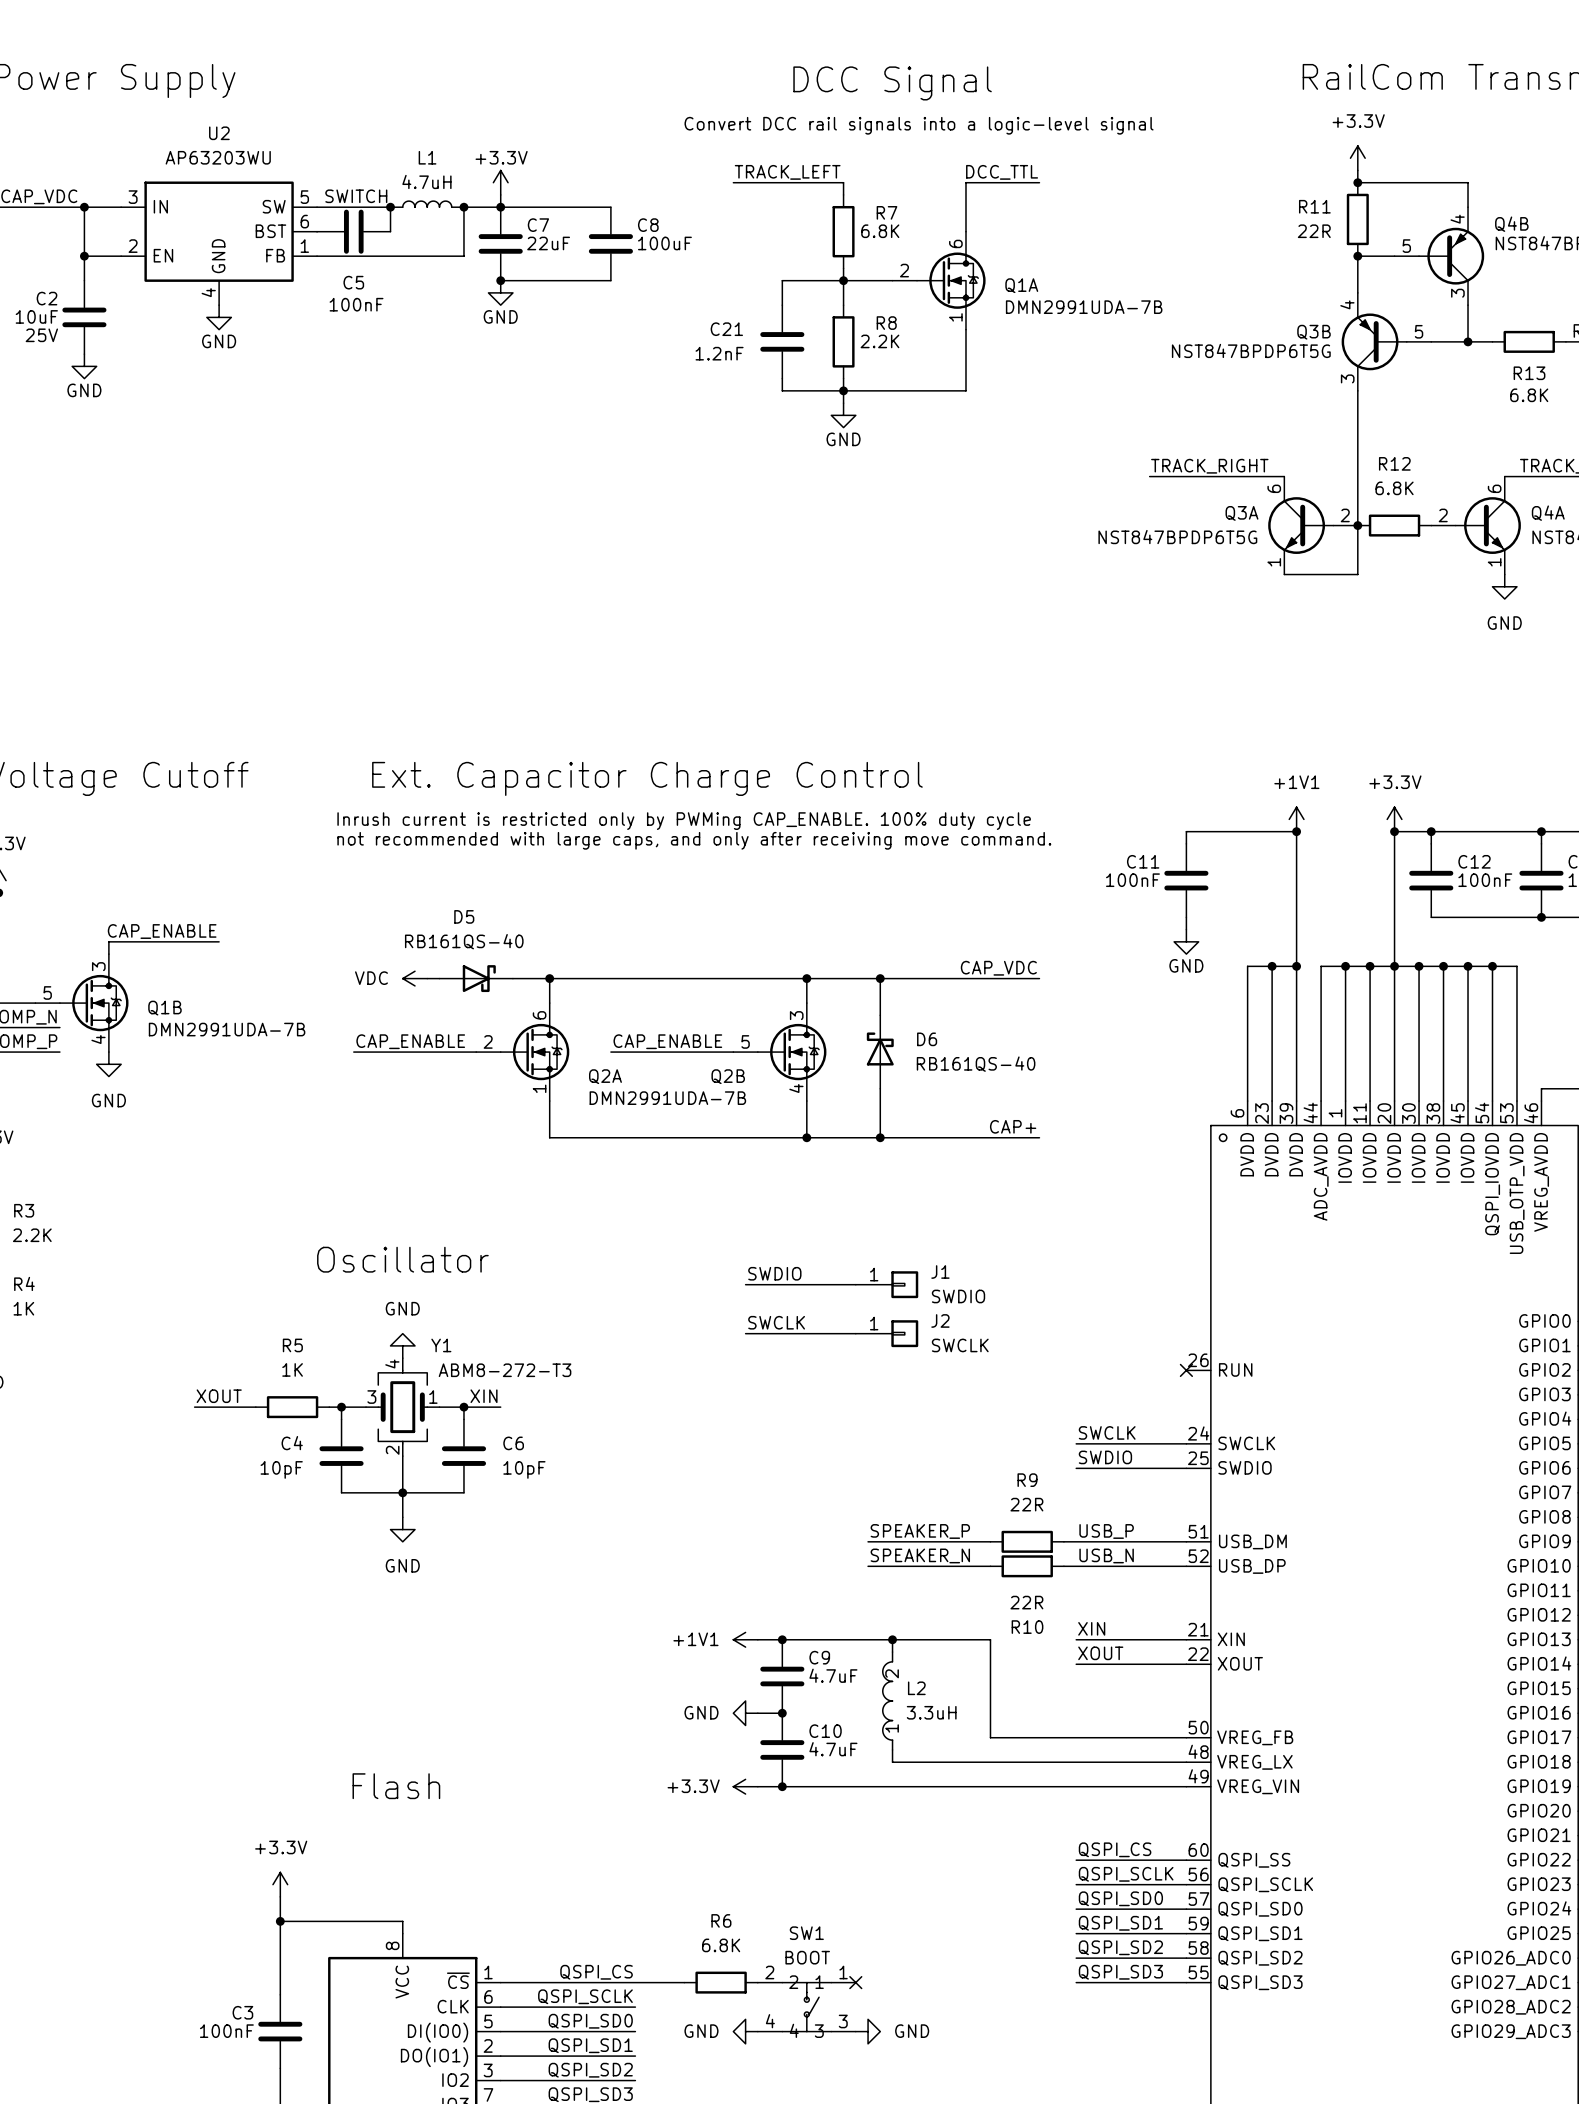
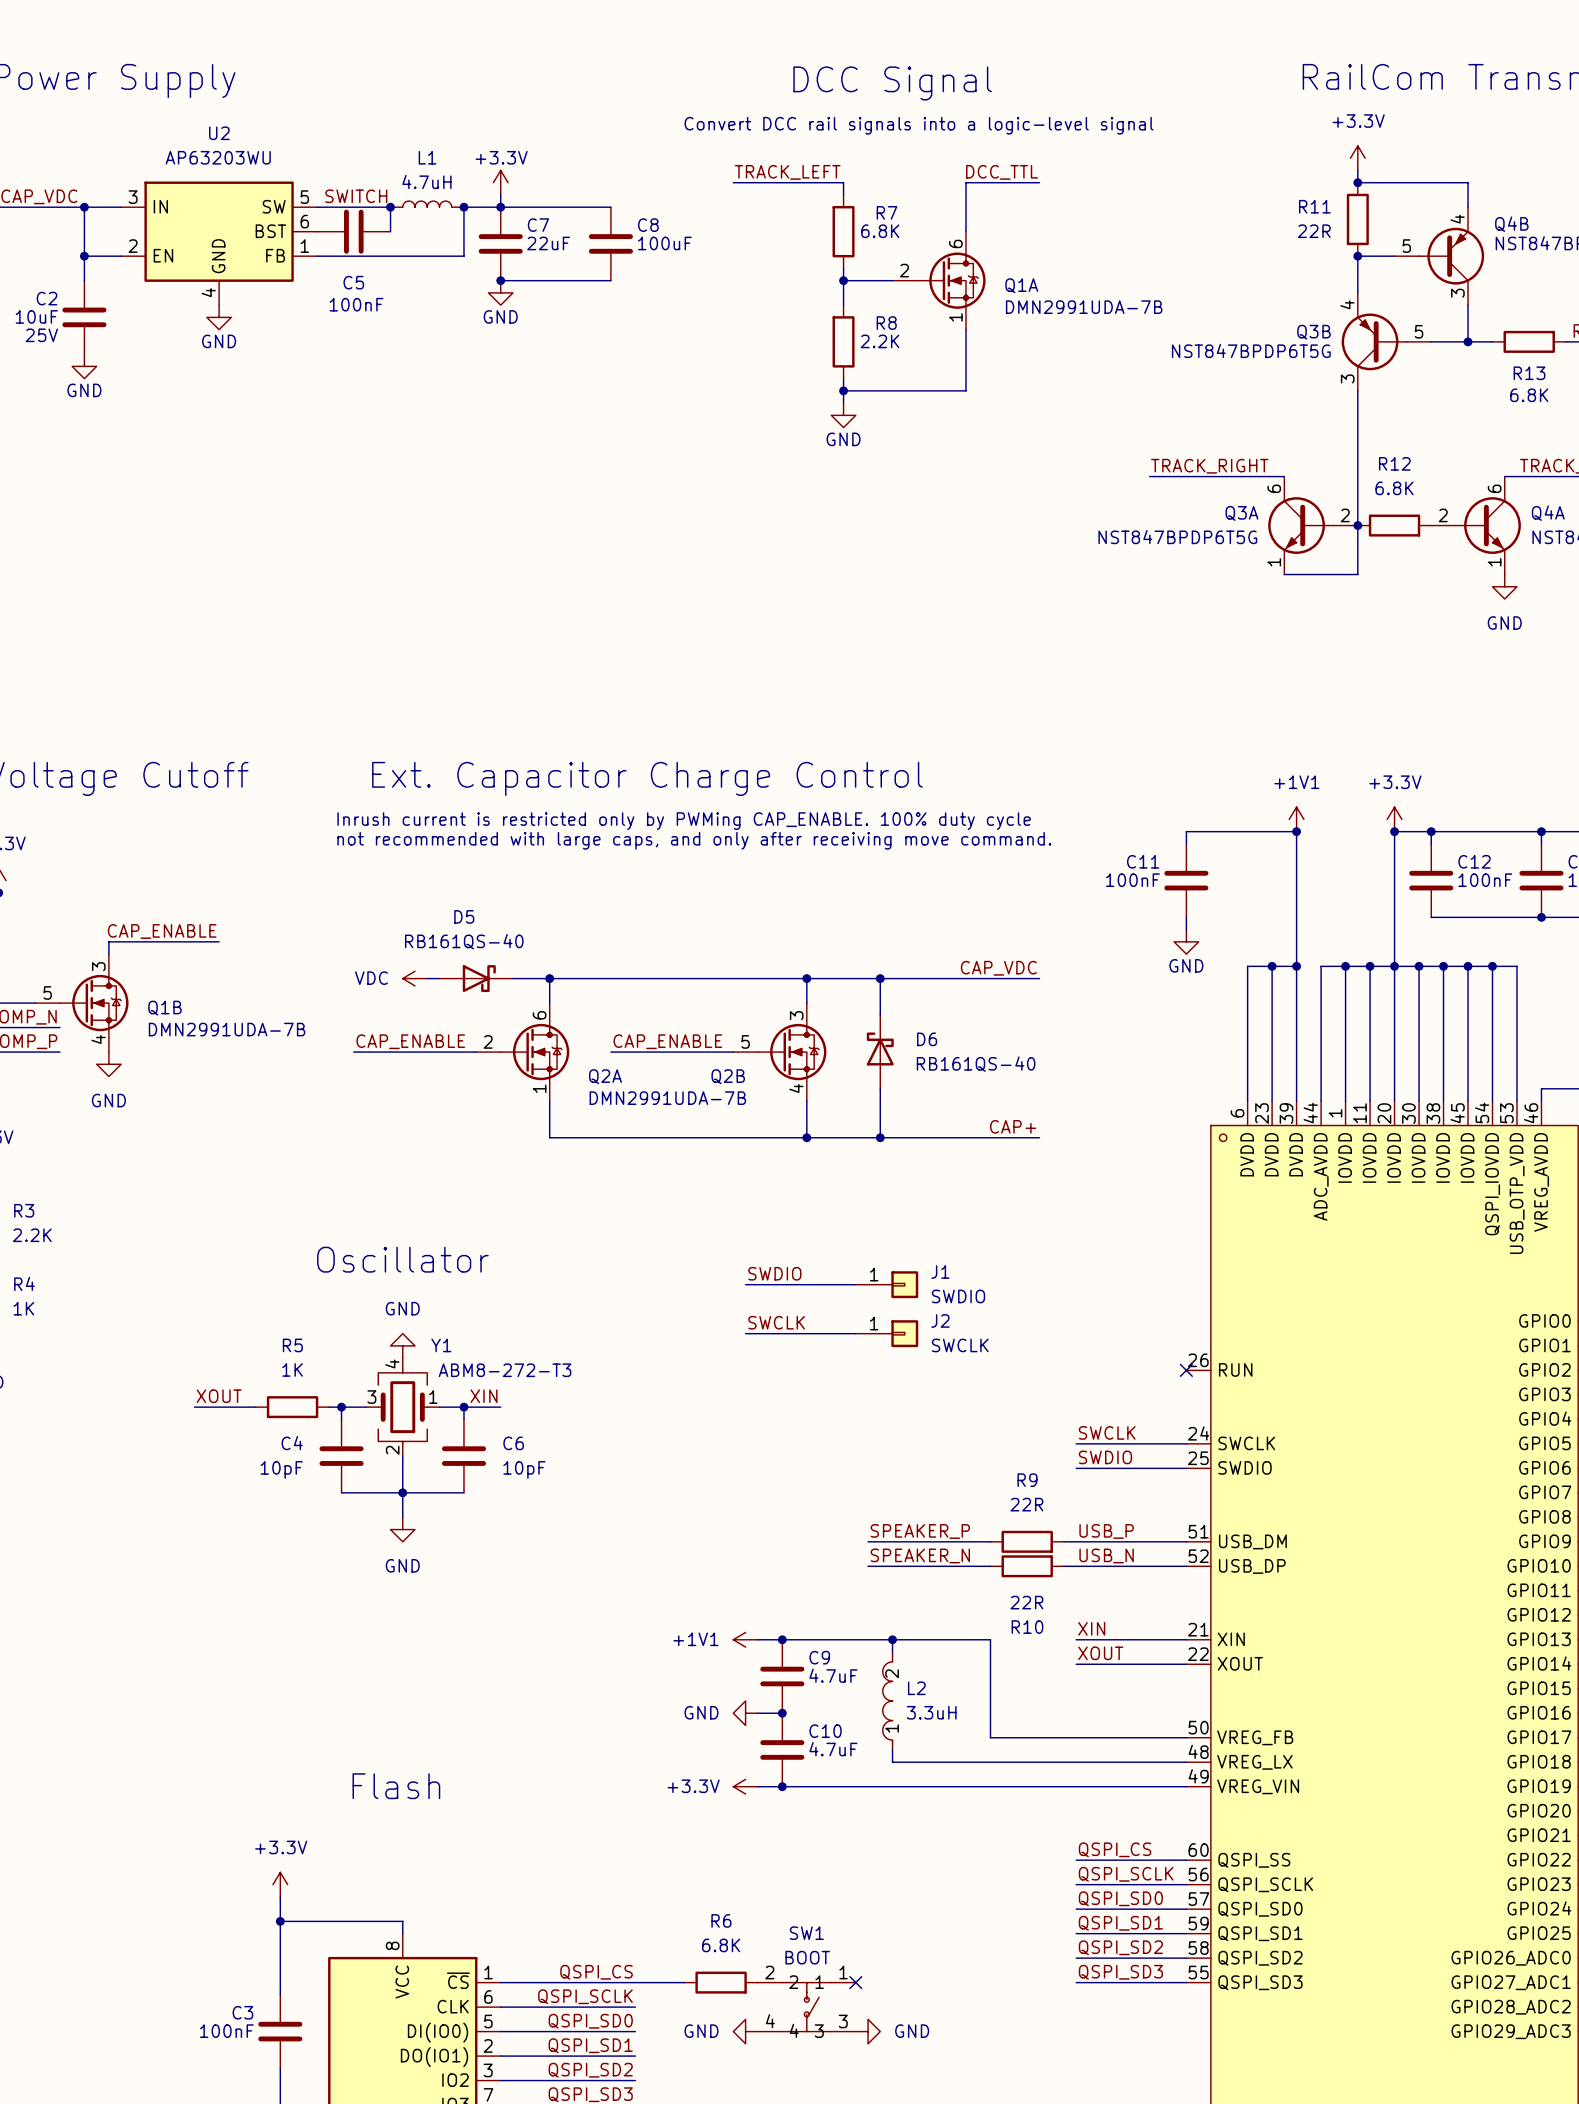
wire: (843, 280) (782, 280) (782, 305) -> none
C21: 1.2nF (782, 341) -> none
wire: (782, 378) (782, 390) (843, 390) -> none

